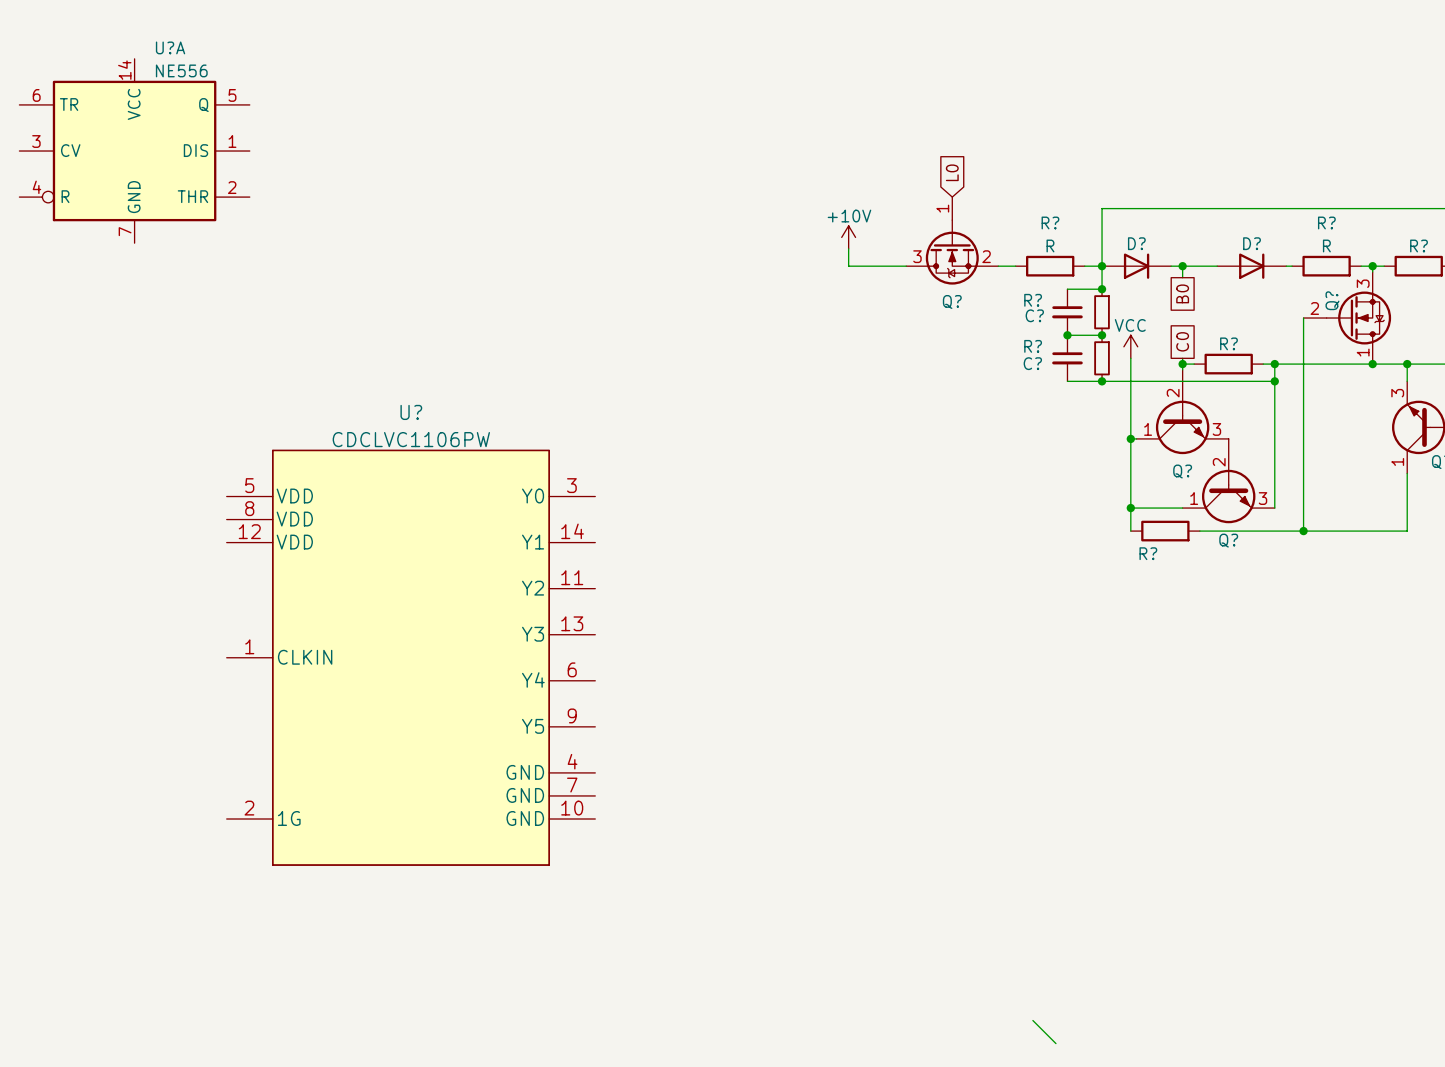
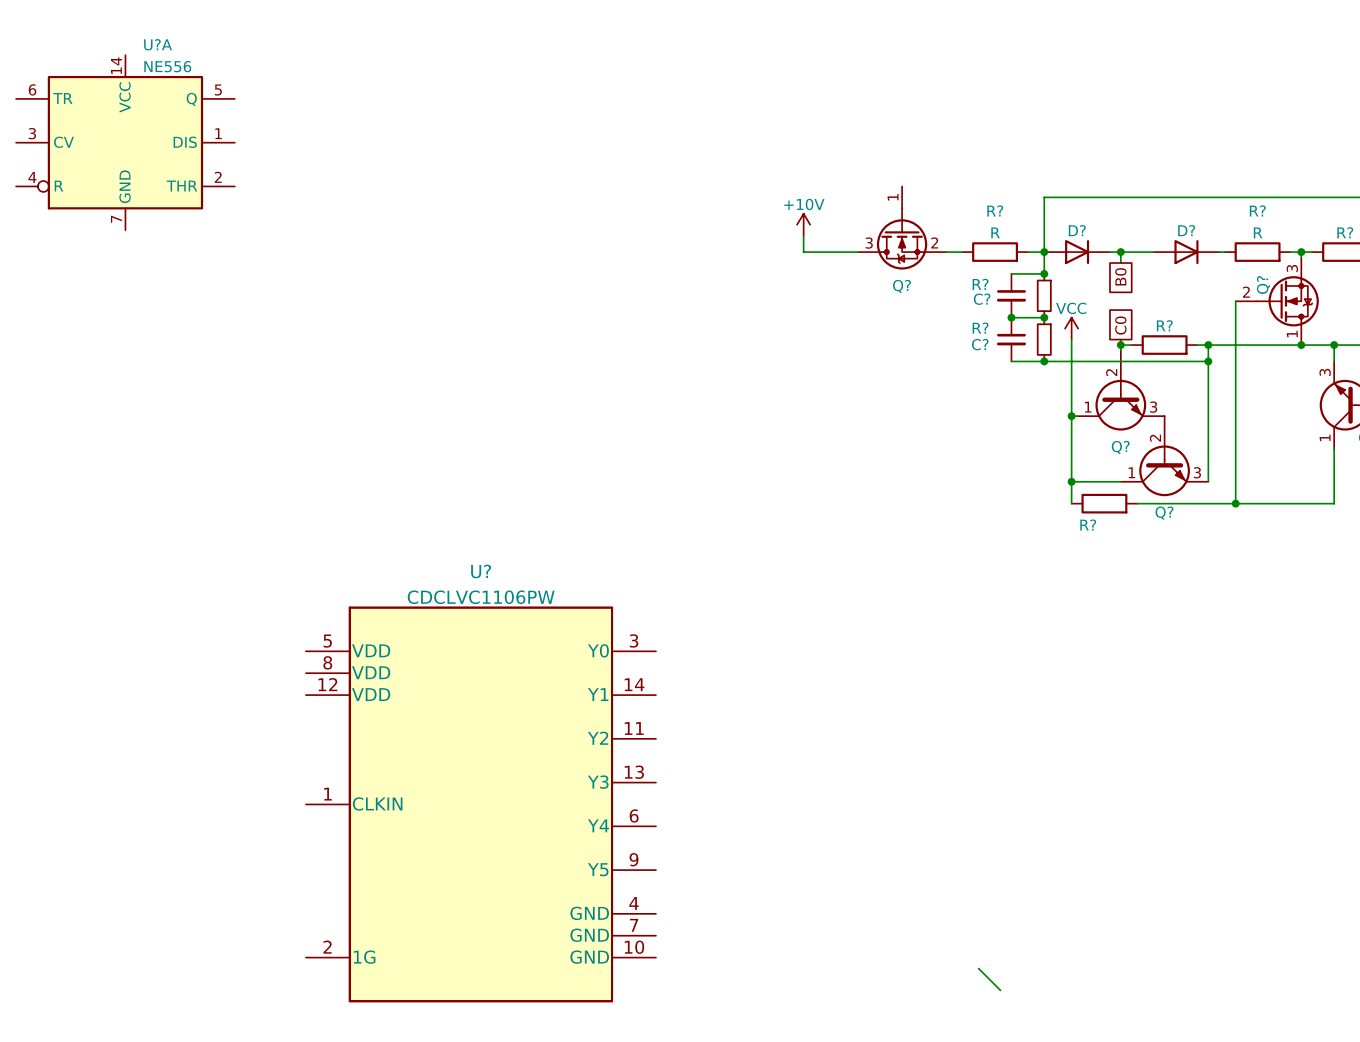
global label: L0 (952, 172) -> none
U? position: (411, 657) -> (480, 804)

